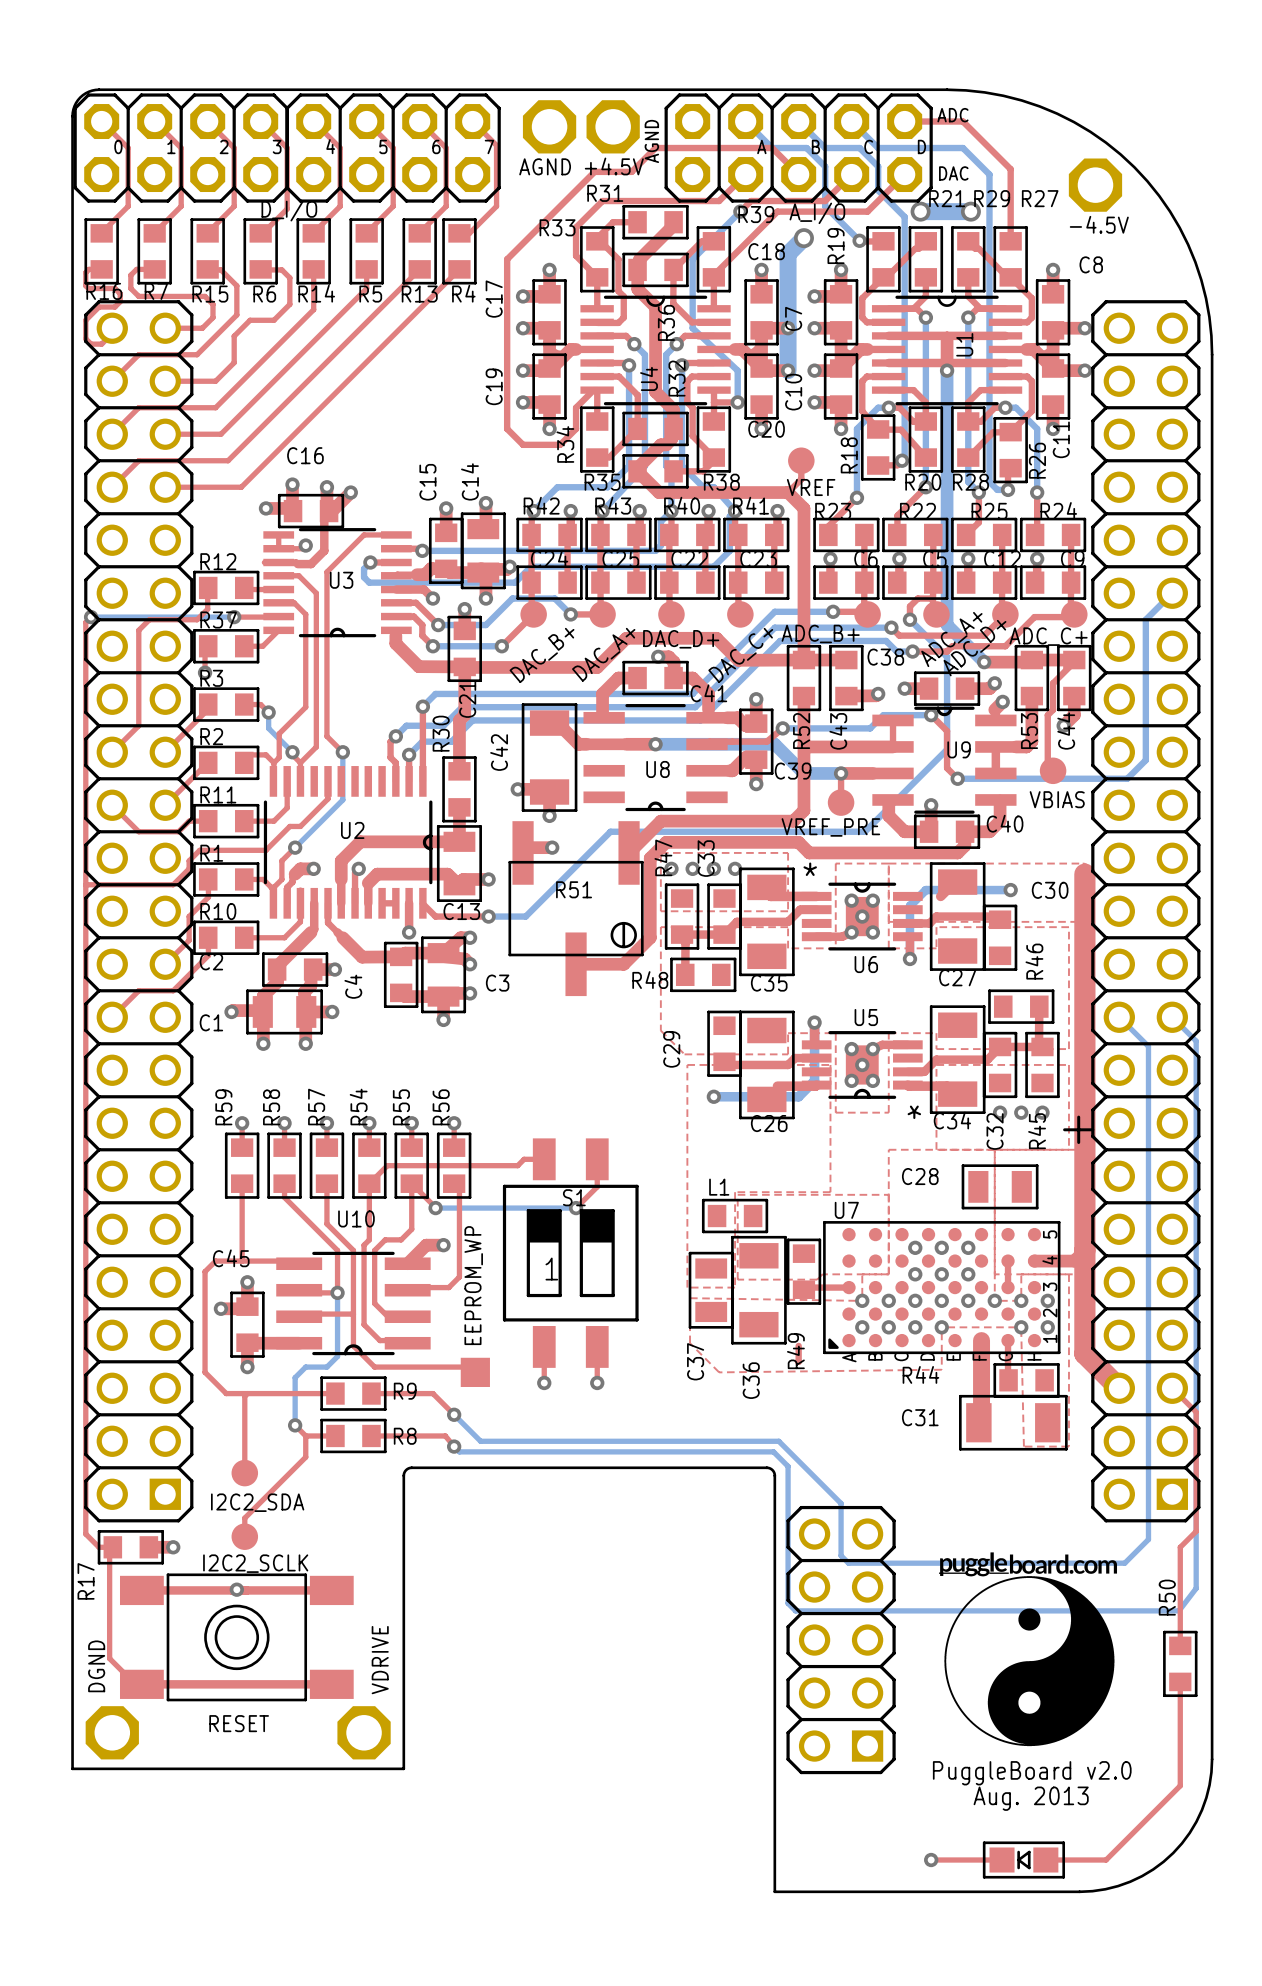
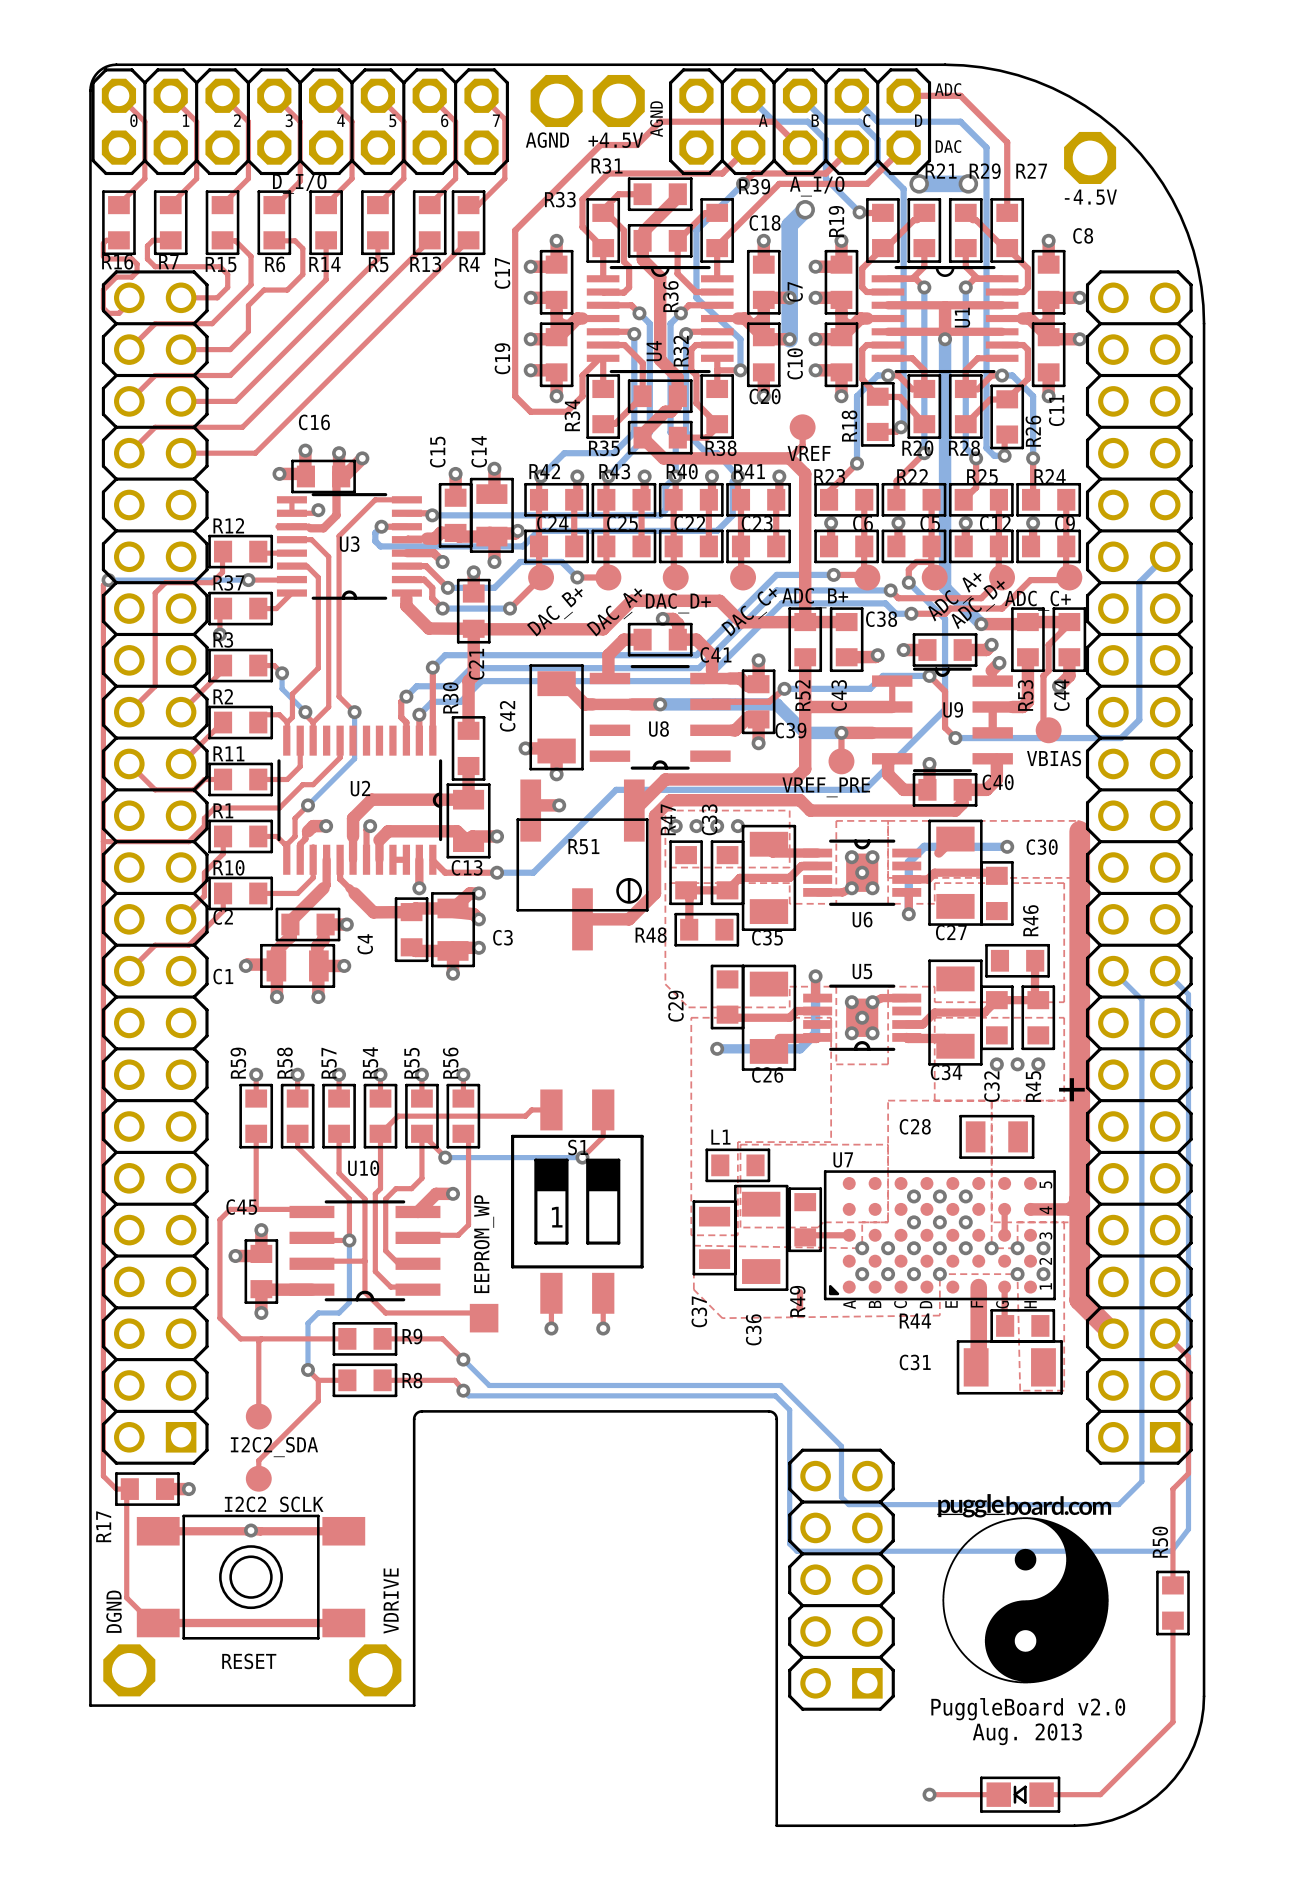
U6 text: * (810, 869) -> none
U5 text: * (914, 1112) -> none

